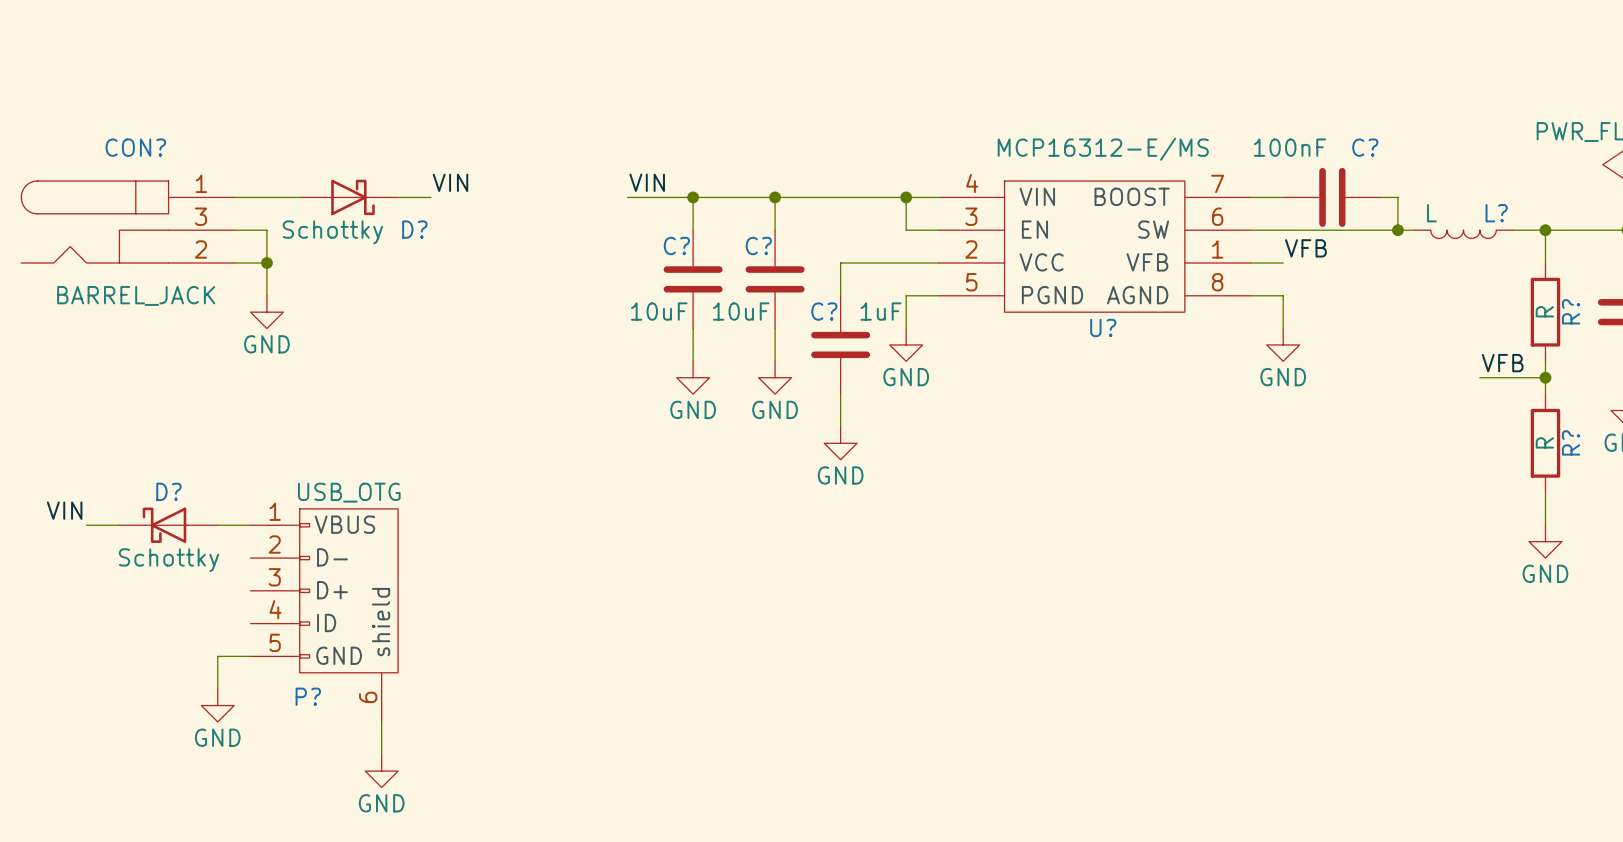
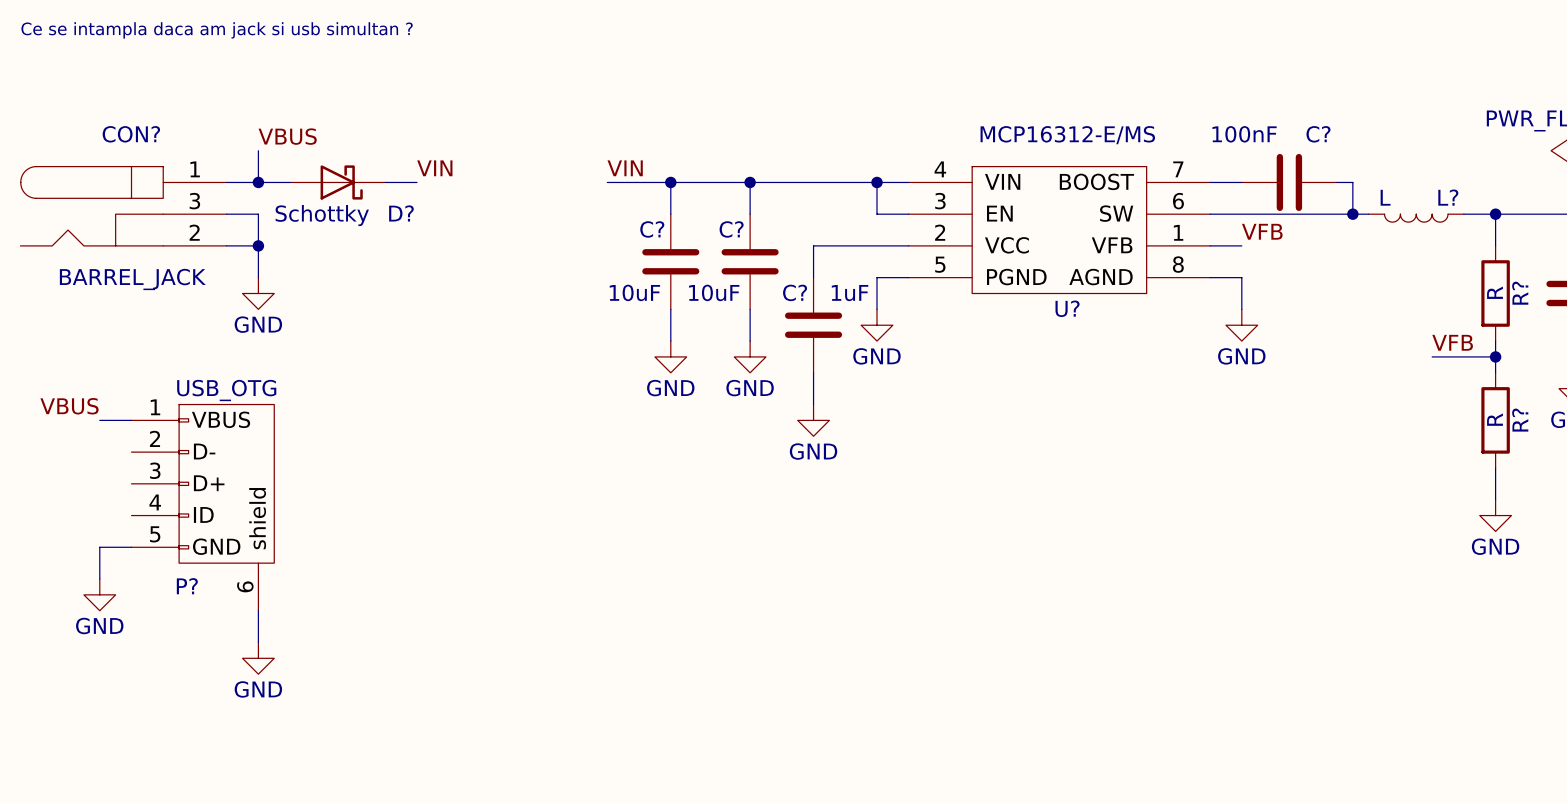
text: none -> Ce se intampla daca am jack si usb simultan ? (217, 30)
label: none -> VBUS (287, 136)
wire: none -> (258, 150) (258, 182)
junction: none -> (258, 182)
label: none -> VBUS (69, 406)
label: VIN (64, 510) -> none
wire: (86, 525) (119, 525) -> none
D?: Schottky (168, 525) -> none
wire: (217, 525) (250, 525) -> (99, 420) (131, 420)
P? position: (324, 615) -> (202, 507)
power symbol: none -> GND (99, 594)
wire: (250, 656) (217, 656) (217, 689) -> (131, 547) (99, 547) (99, 579)
power symbol position: GND (217, 705) -> GND (258, 658)
wire: (381, 721) (381, 754) -> (258, 610) (258, 642)
power symbol: GND (381, 771) -> none

